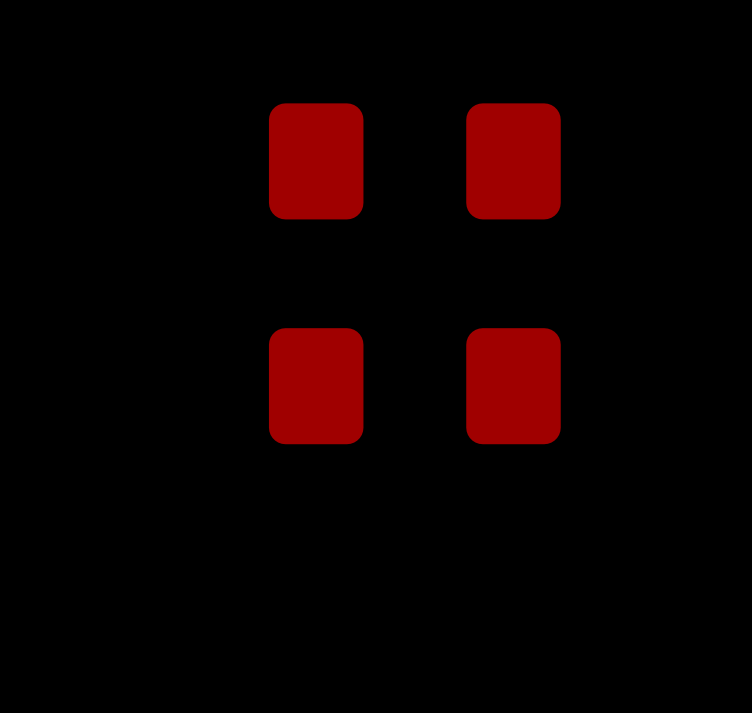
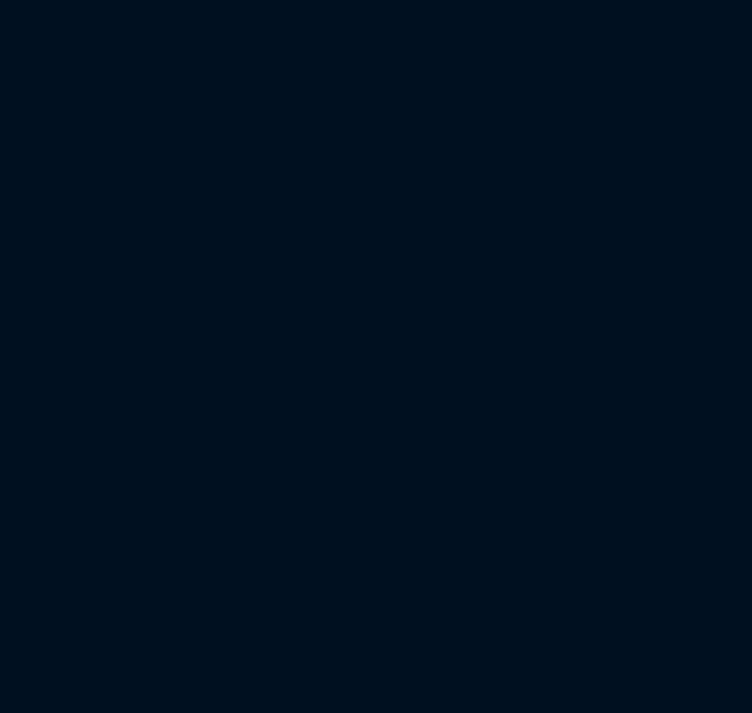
part: (414, 161) -> none
part: (414, 386) -> none

